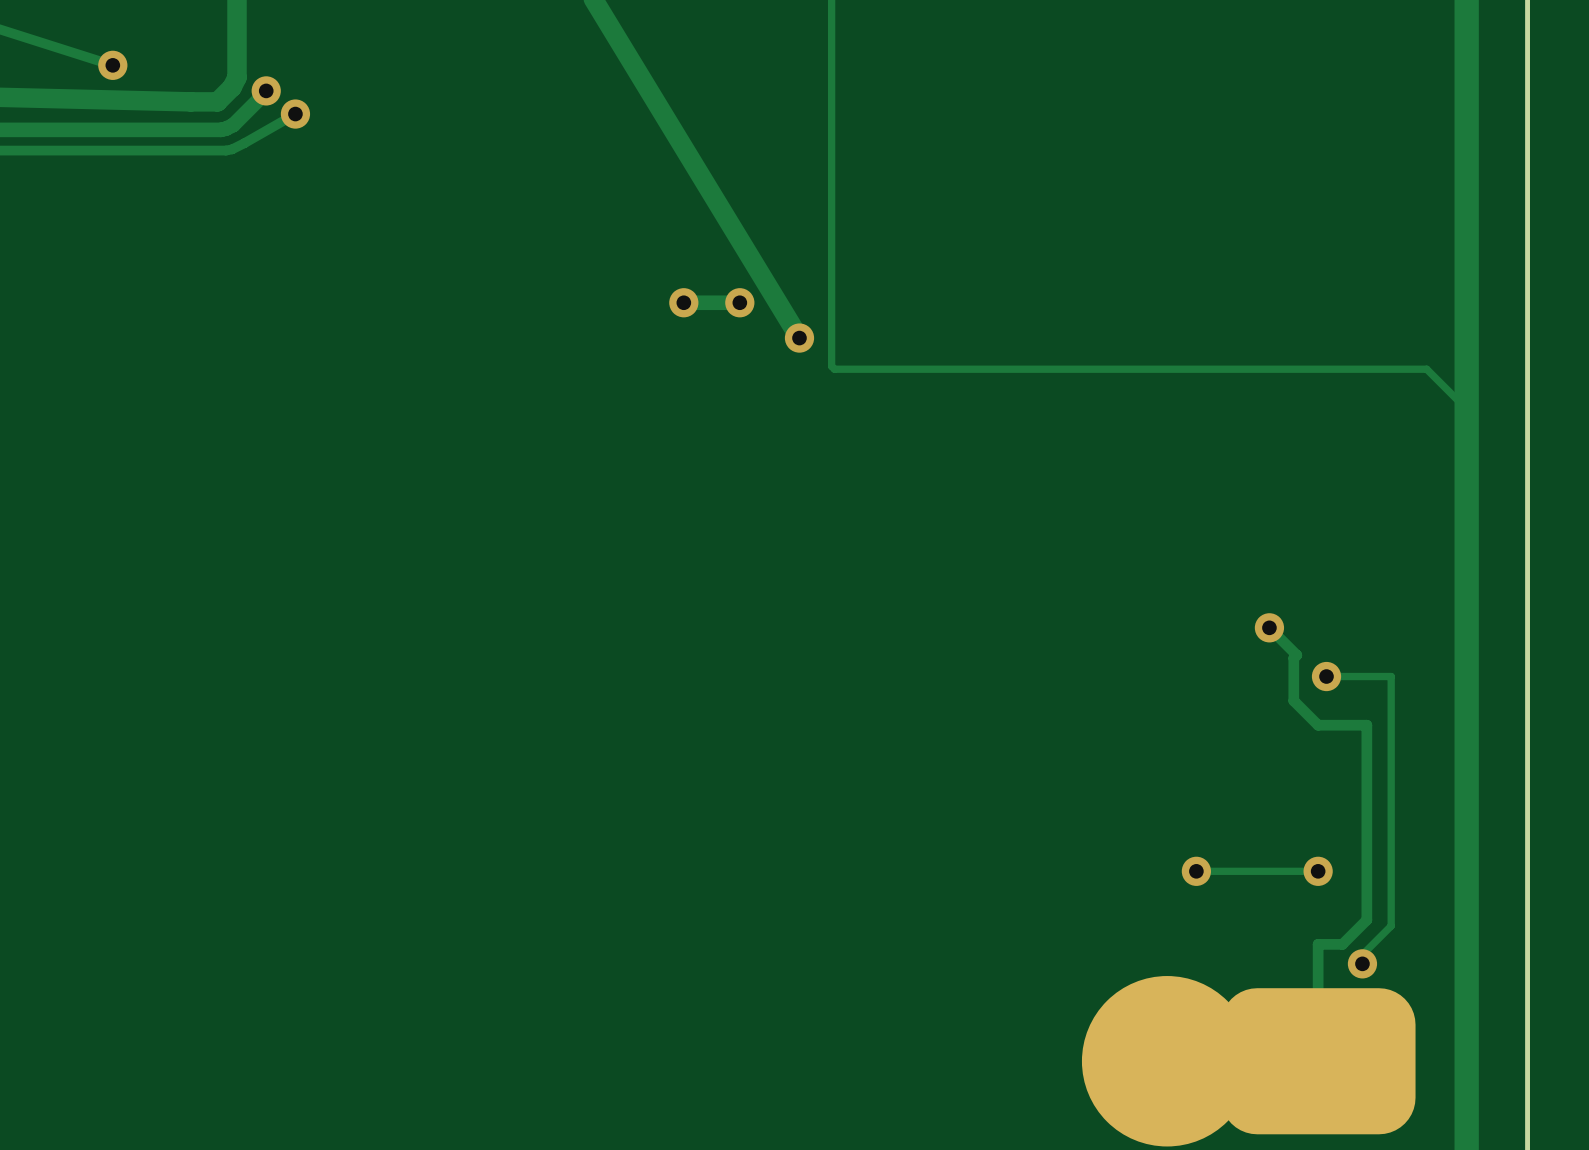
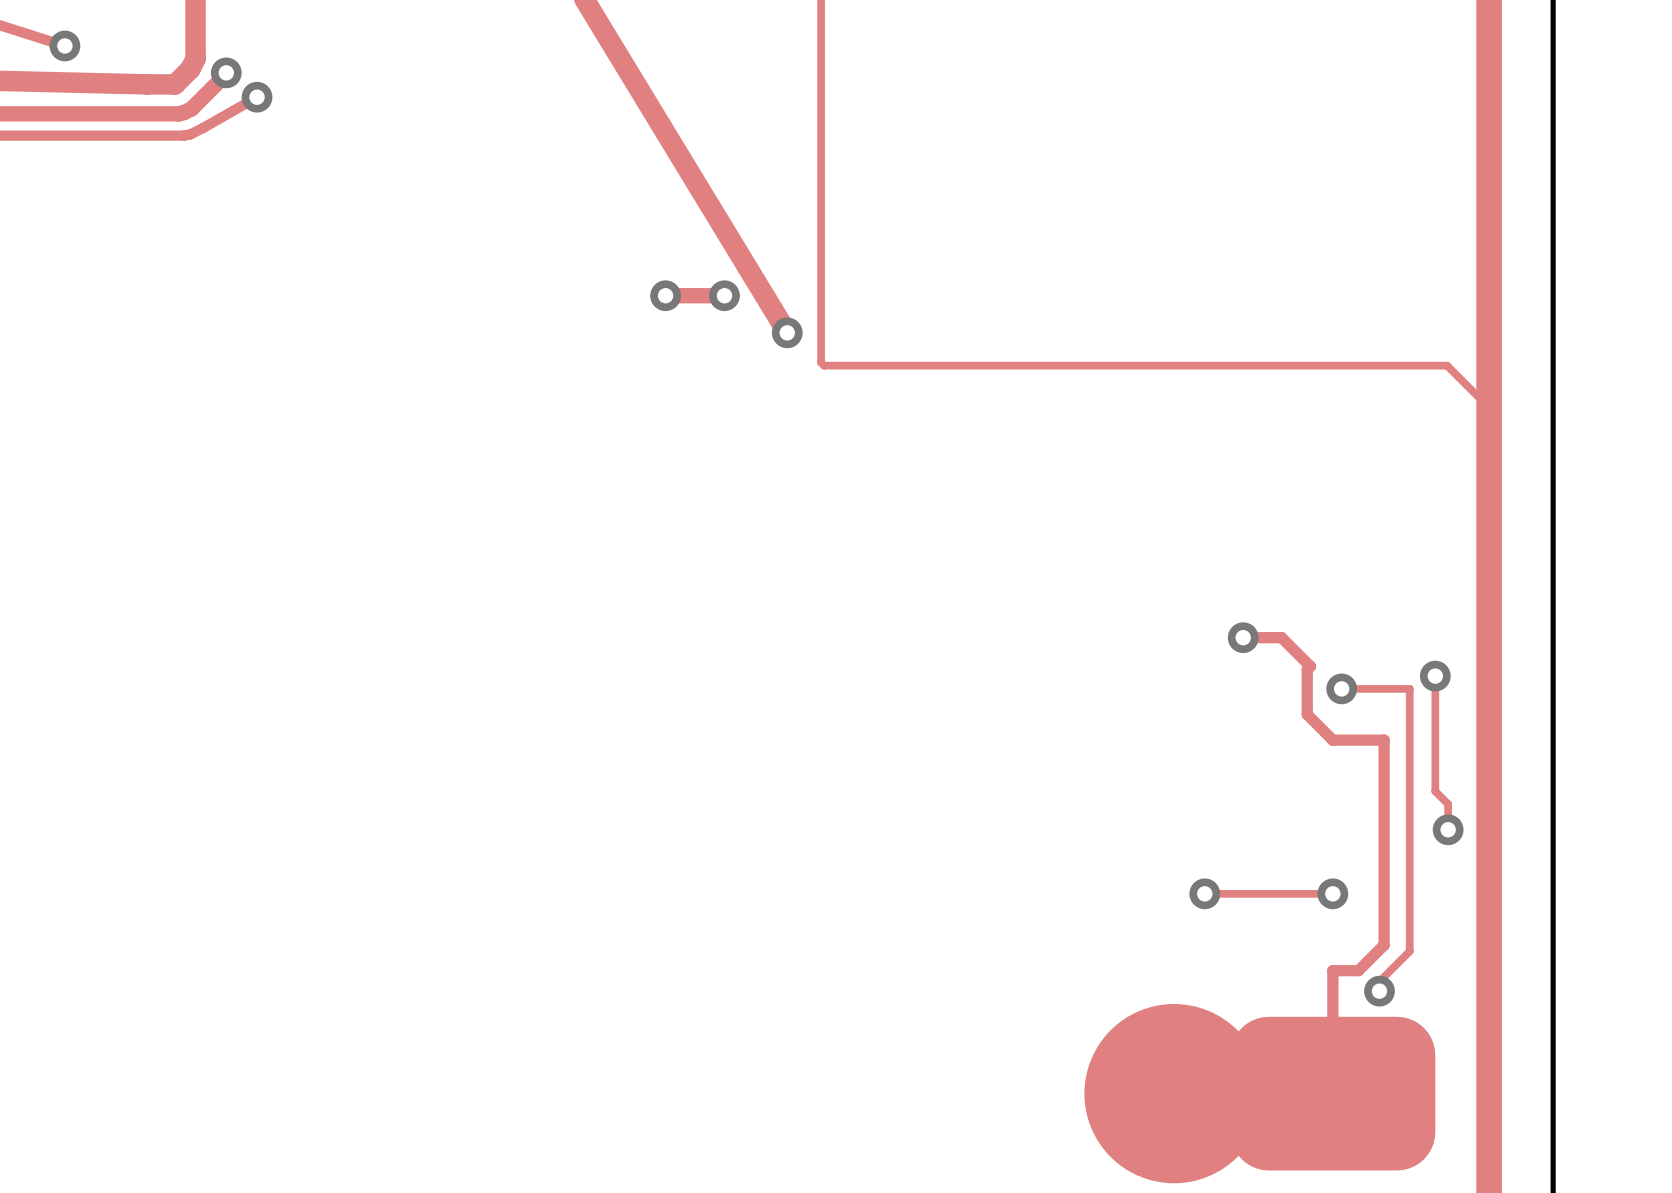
track: none -> (1243, 637) (1281, 637)
via position: (1269, 627) -> (1243, 637)
track: none -> (1435, 676) (1435, 791) (1448, 804) (1448, 829)
via: none -> (1435, 676)
via: none -> (1448, 829)

